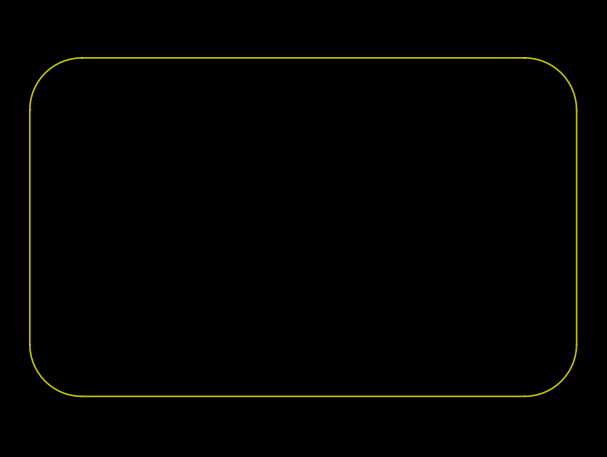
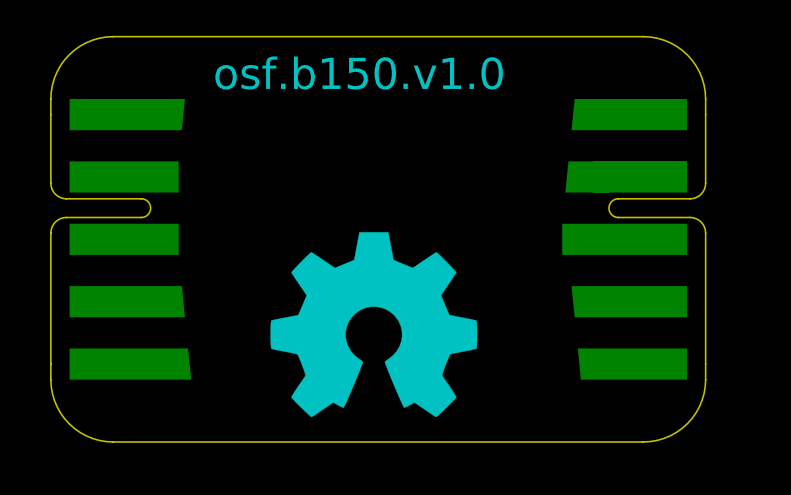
text: none -> osf.b150.v1.0 (359, 73)
board edge: (29, 122) (29, 331) -> none
board edge: (576, 122) (576, 331) -> none
drawing: none -> [270, 232, 478, 418]
part: none -> (120, 239)
part: none -> (634, 239)

